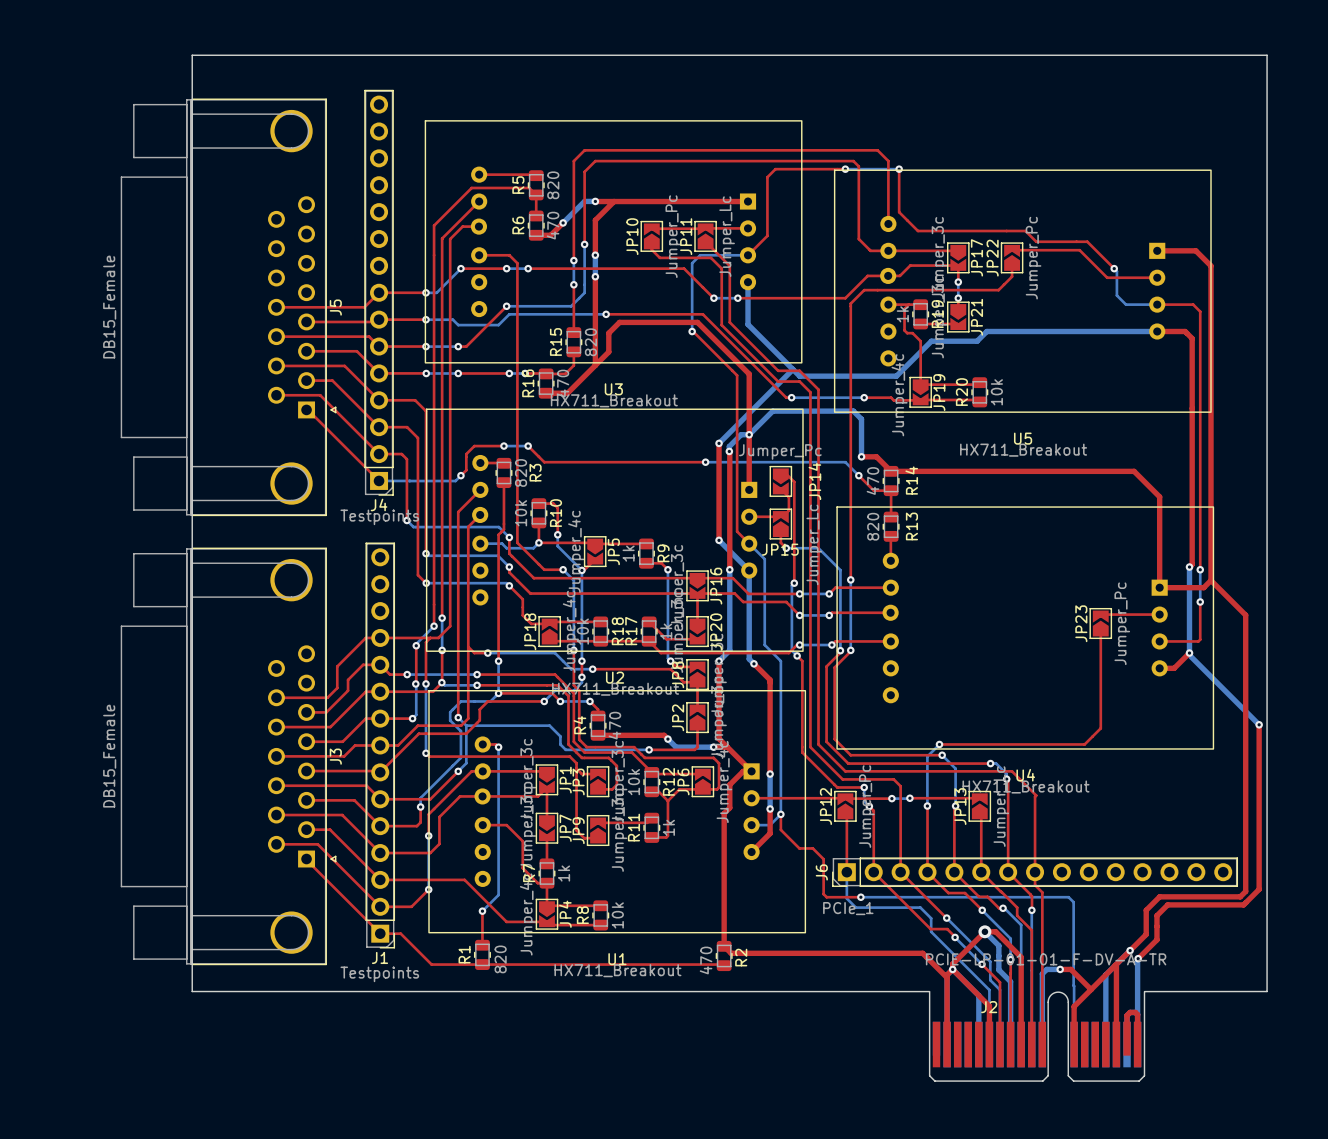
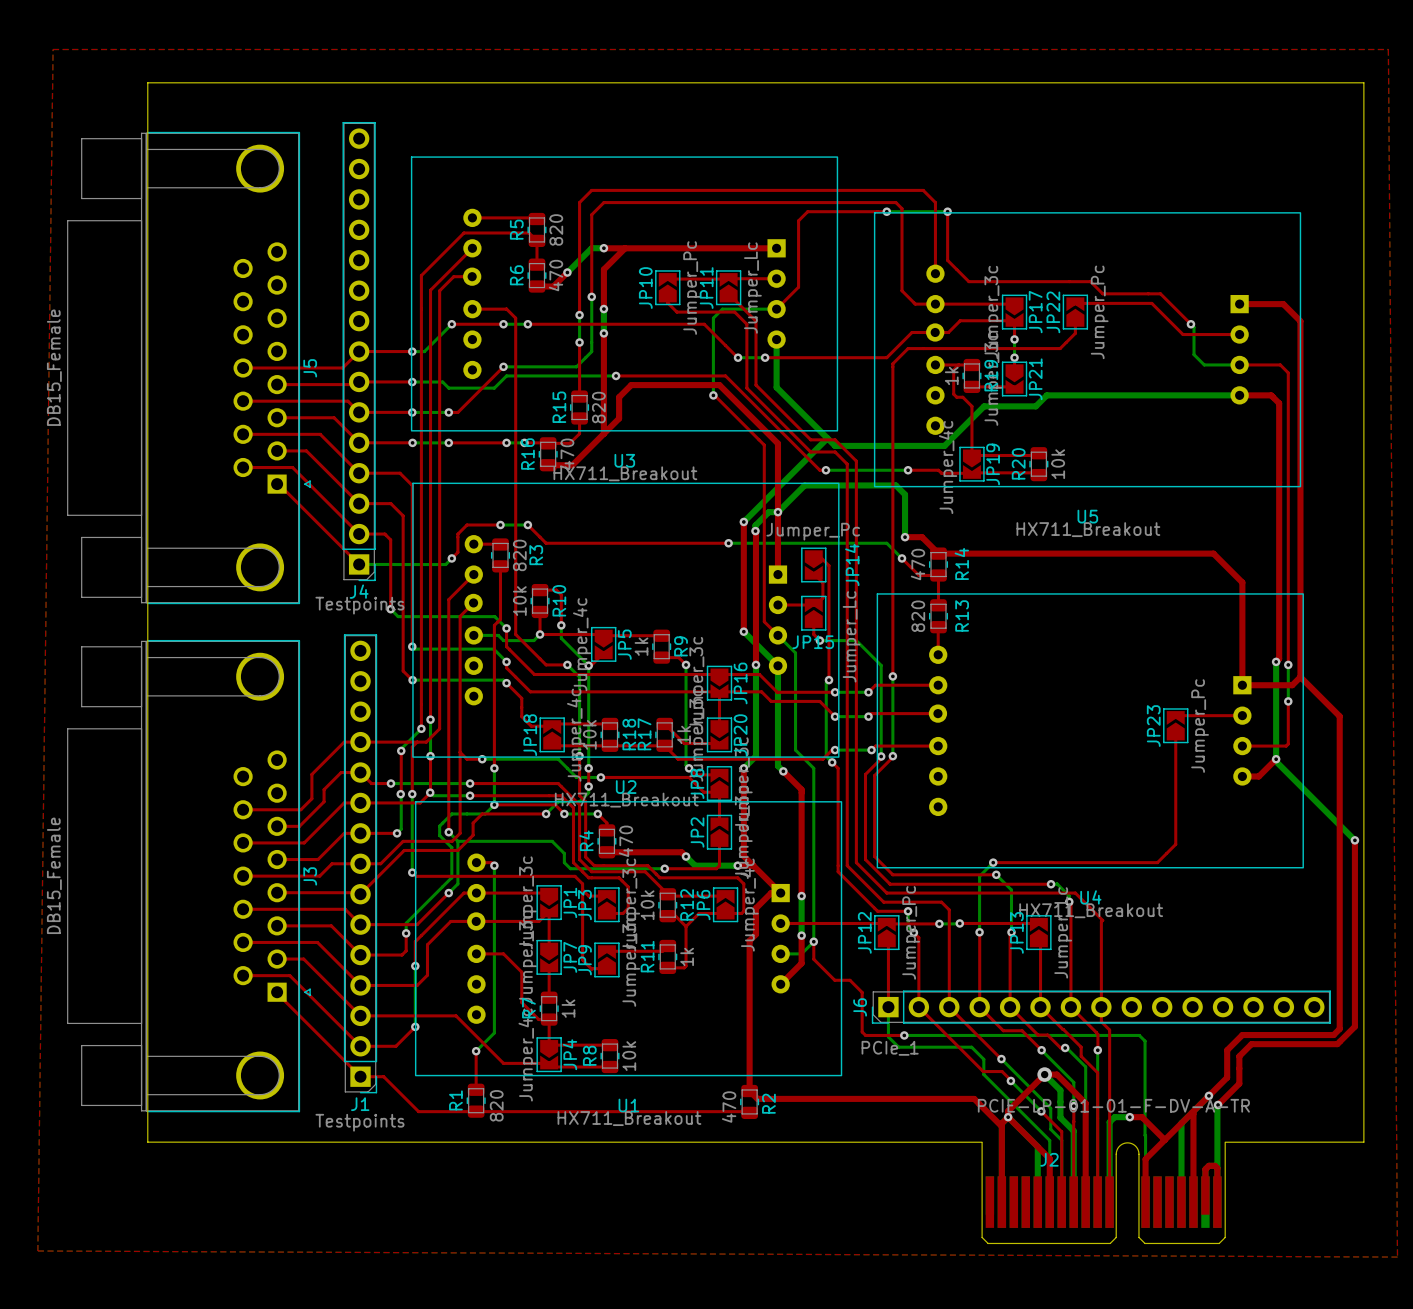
top zone outline: none -> (53, 49) (37, 1250) (1397, 1257) (1388, 49) (53, 49)

